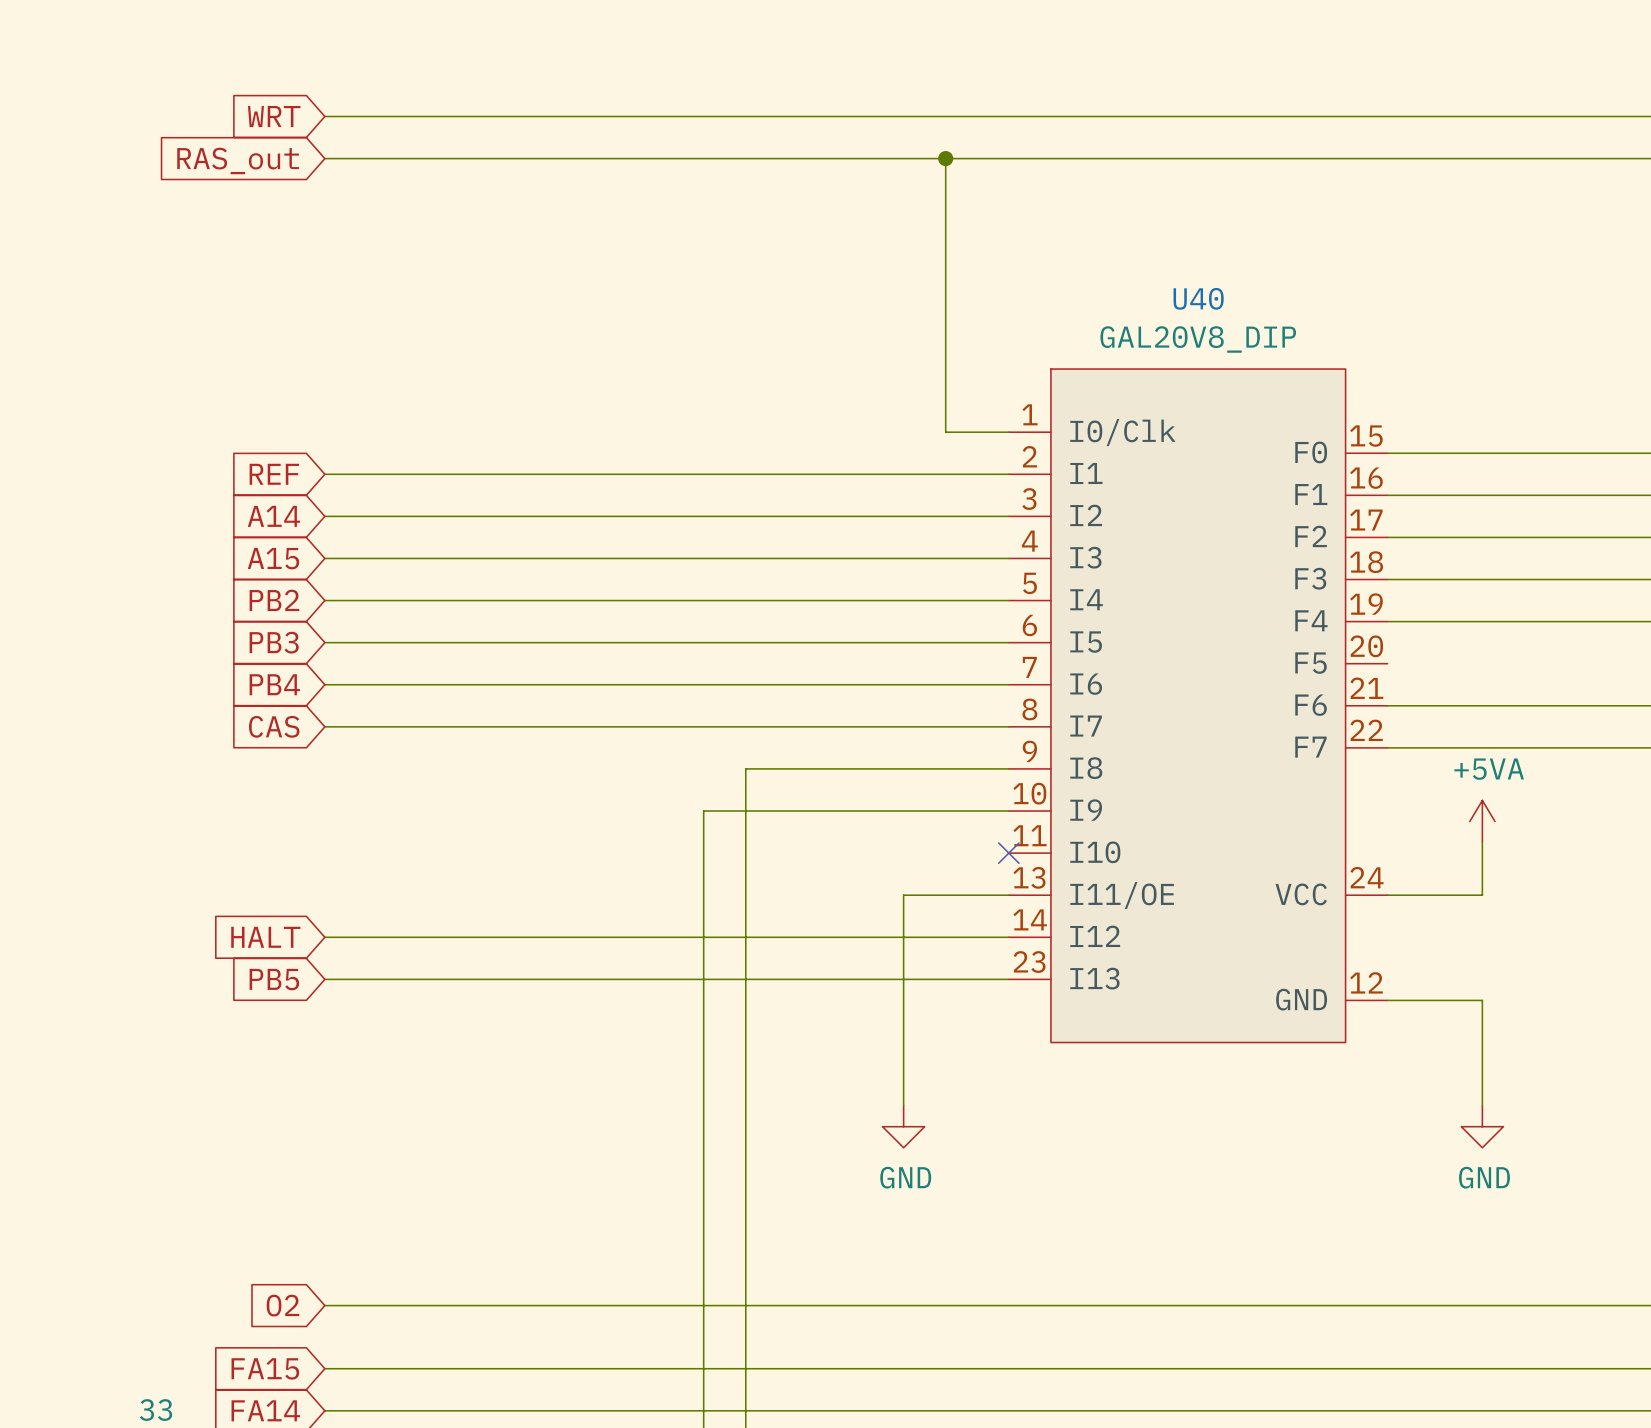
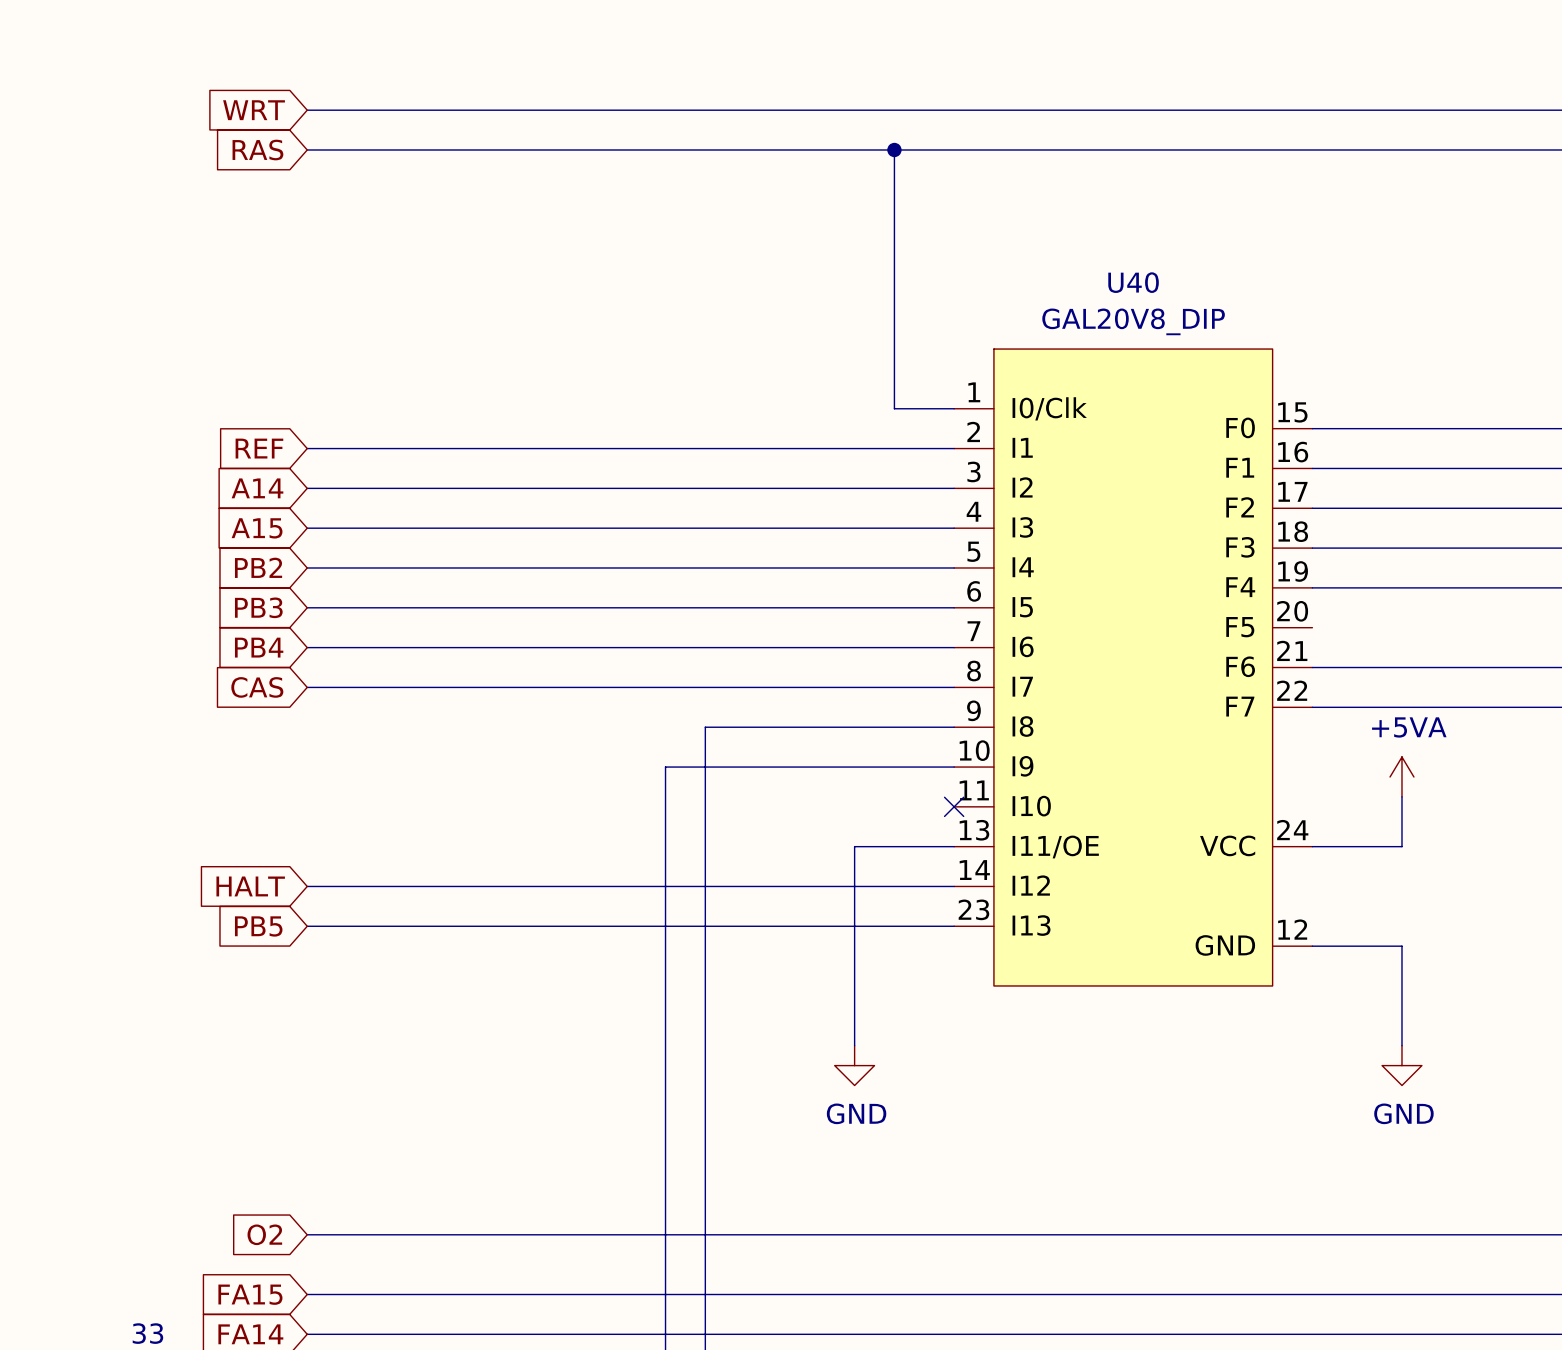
global label: RAS_out (238, 160) -> RAS (257, 150)

